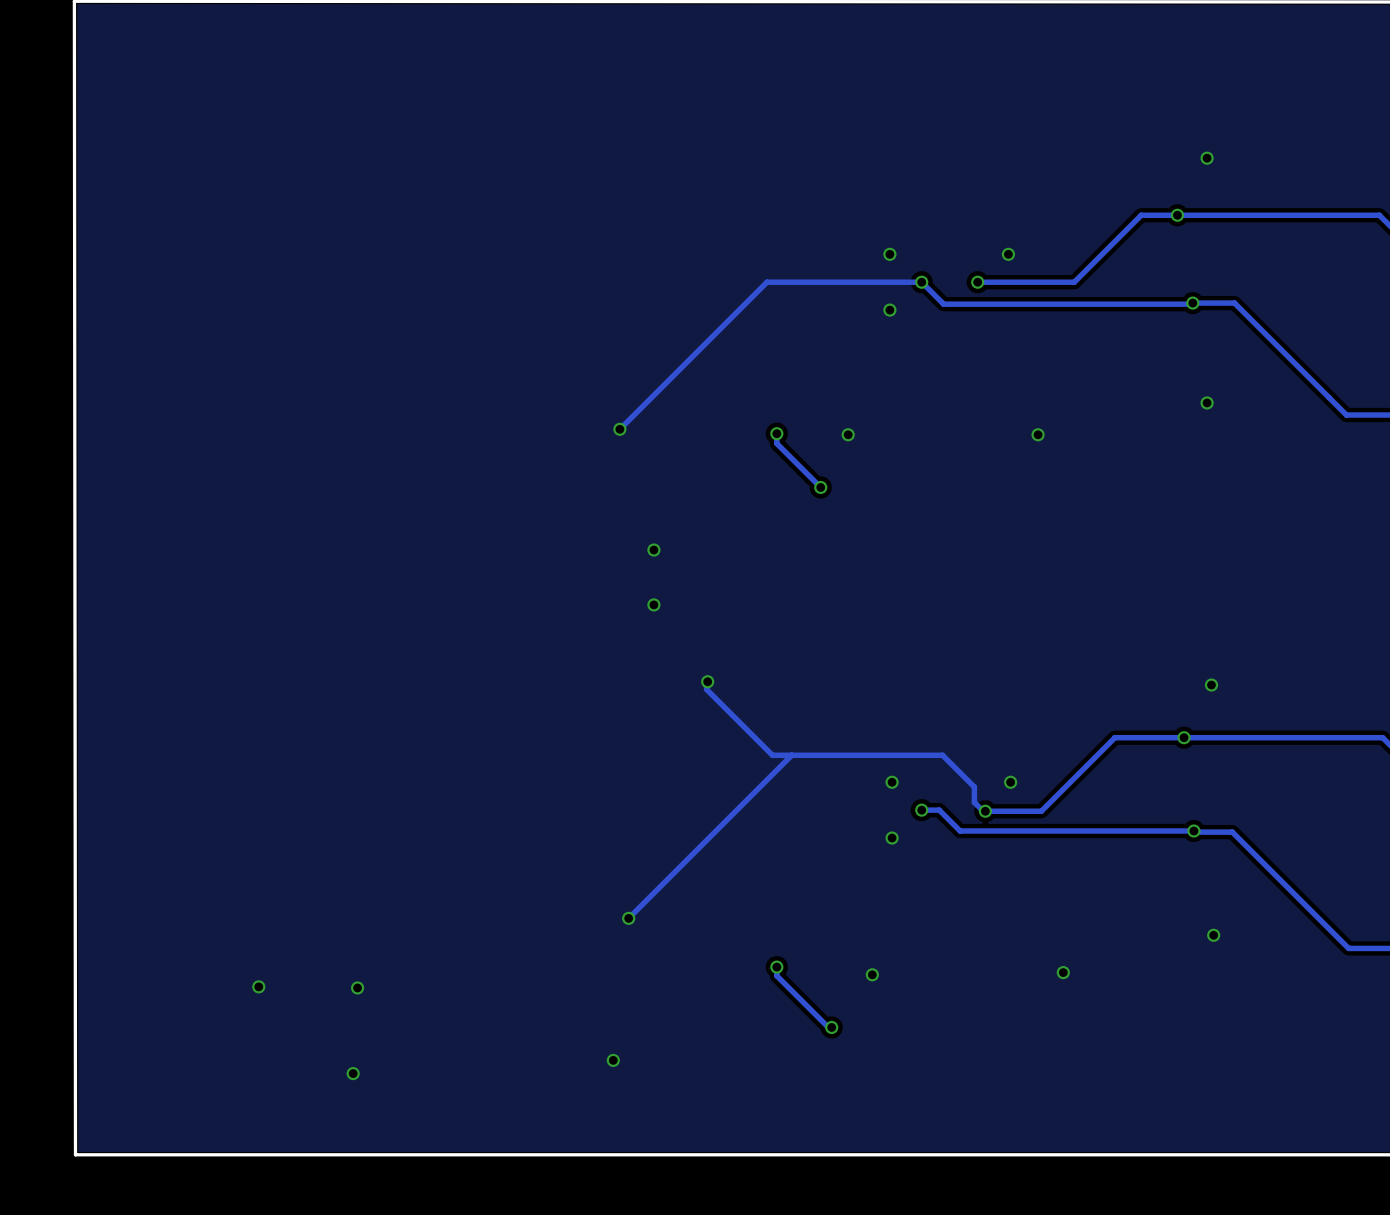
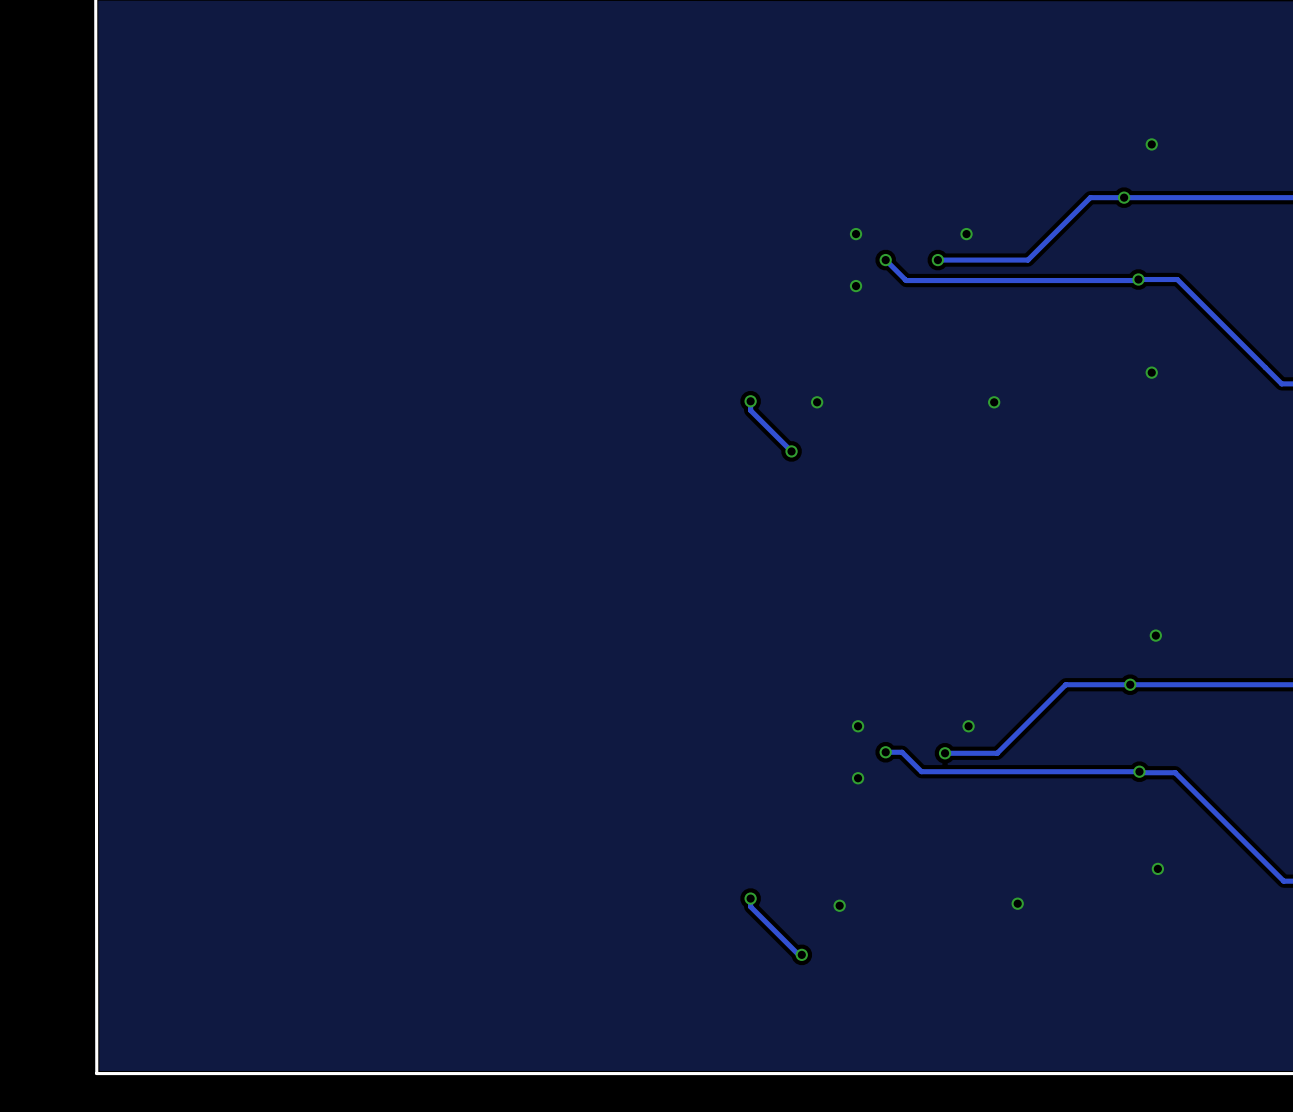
track: (921, 282) (766, 282) (619, 429) -> none
via: (619, 429) -> none
via: (653, 550) -> none
via: (653, 604) -> none
track: (707, 681) (706, 689) (772, 755) (942, 755) (974, 787) (974, 802) (985, 811) -> none
via: (707, 681) -> none
track: (791, 755) (628, 918) -> none
via: (628, 918) -> none
via: (258, 986) -> none
via: (357, 987) -> none
via: (613, 1060) -> none
via: (353, 1073) -> none

